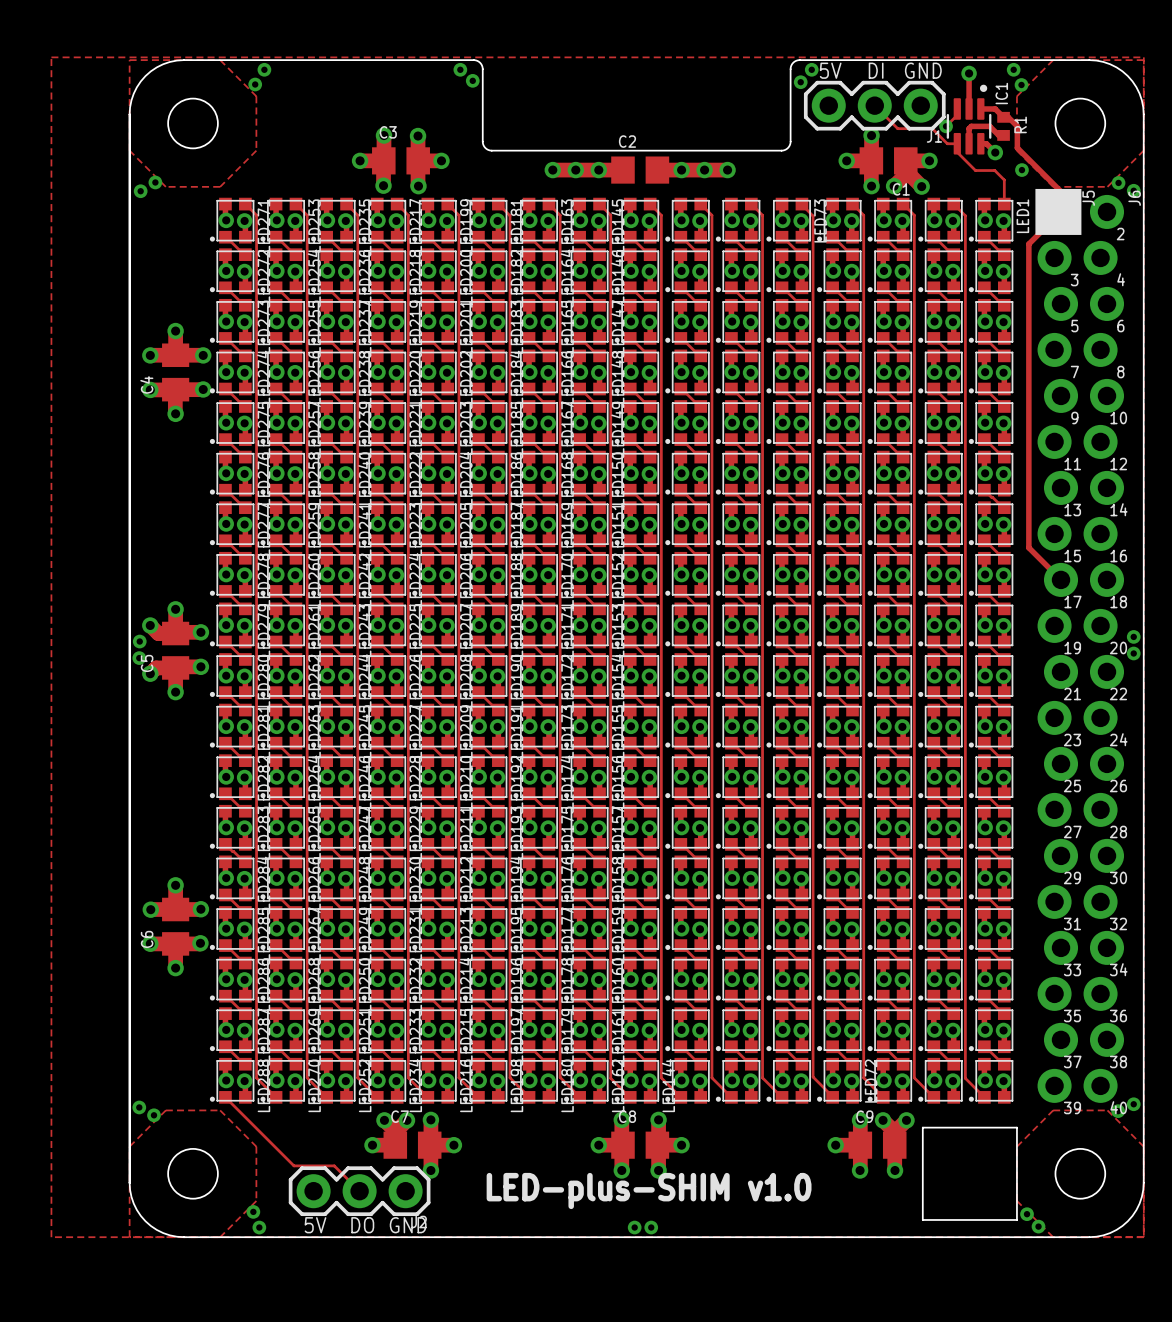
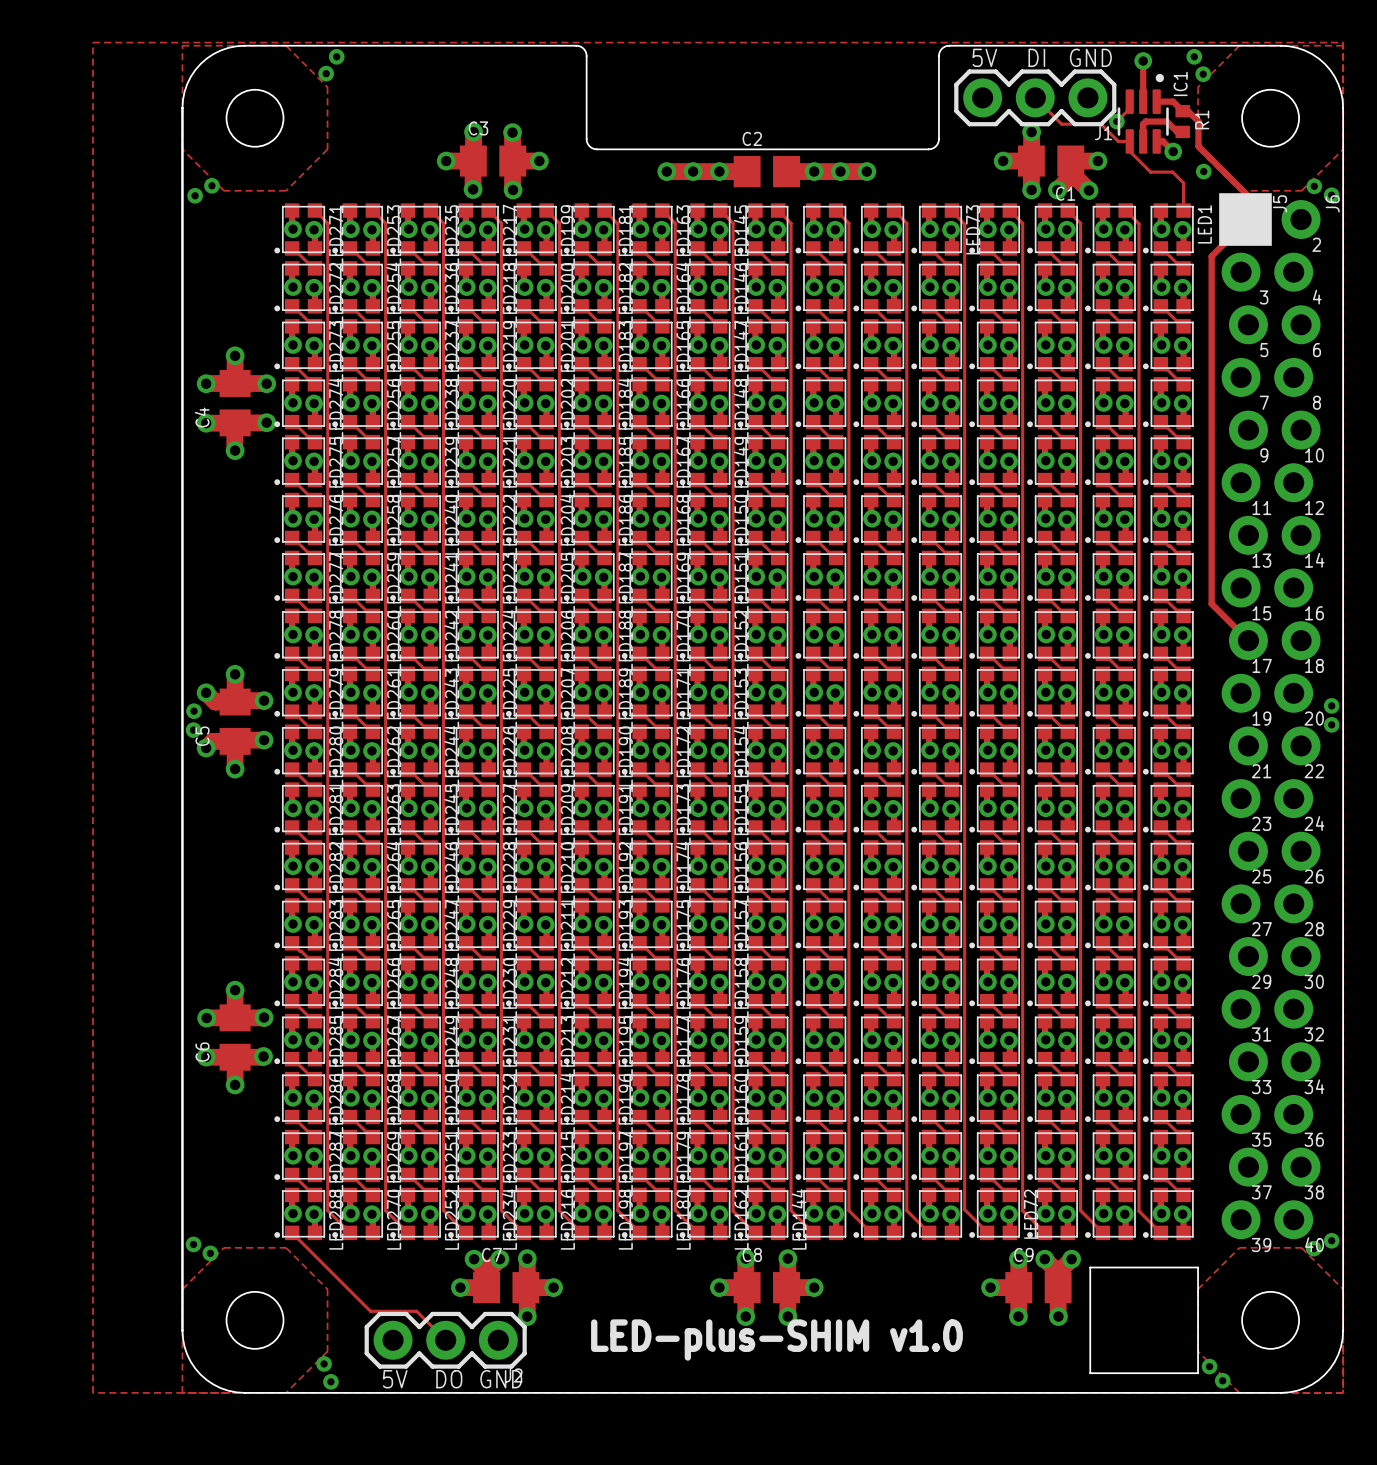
via: (460, 69) -> none
via: (811, 69) -> none
via: (472, 80) -> none
via: (800, 82) -> none
via: (634, 1227) -> none
via: (651, 1227) -> none

